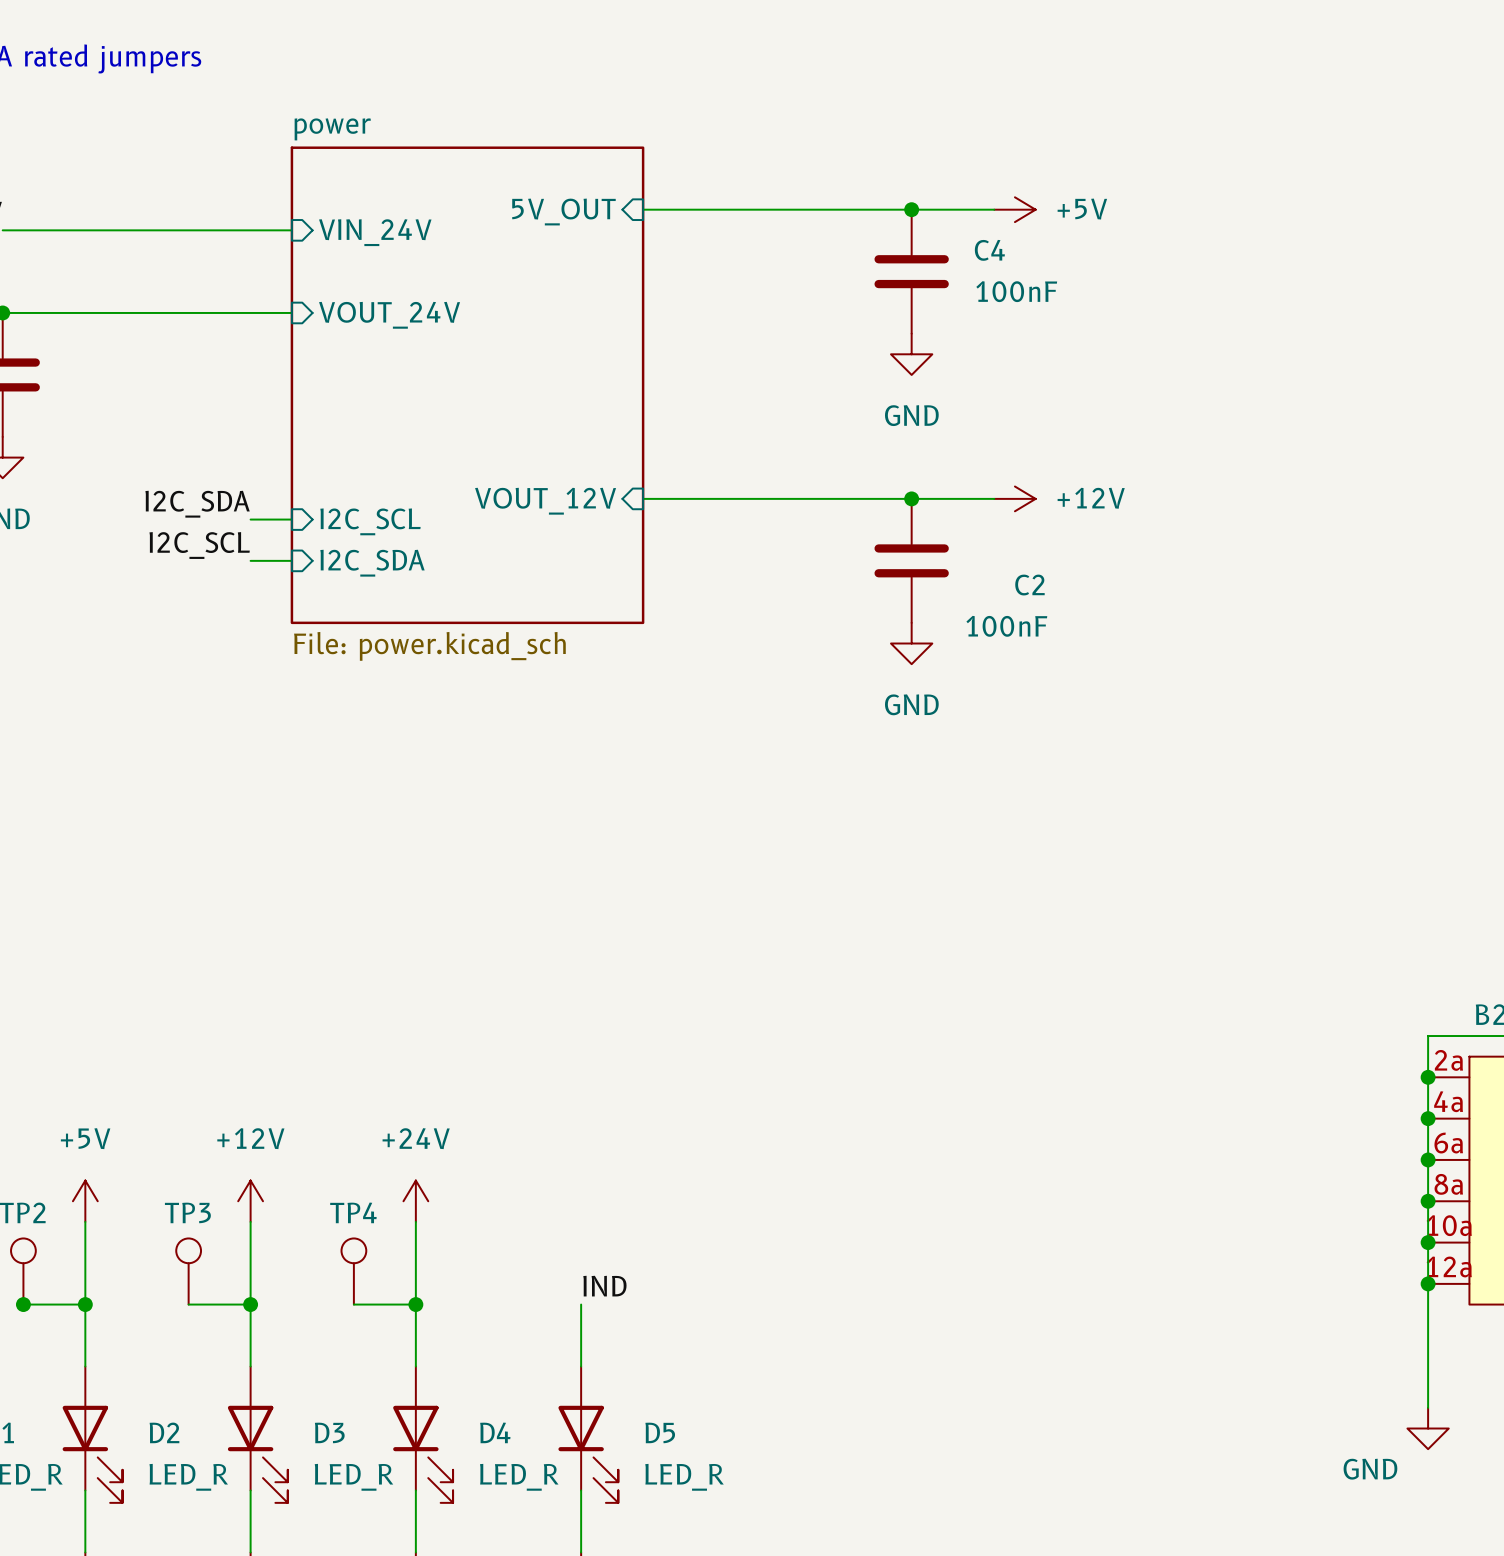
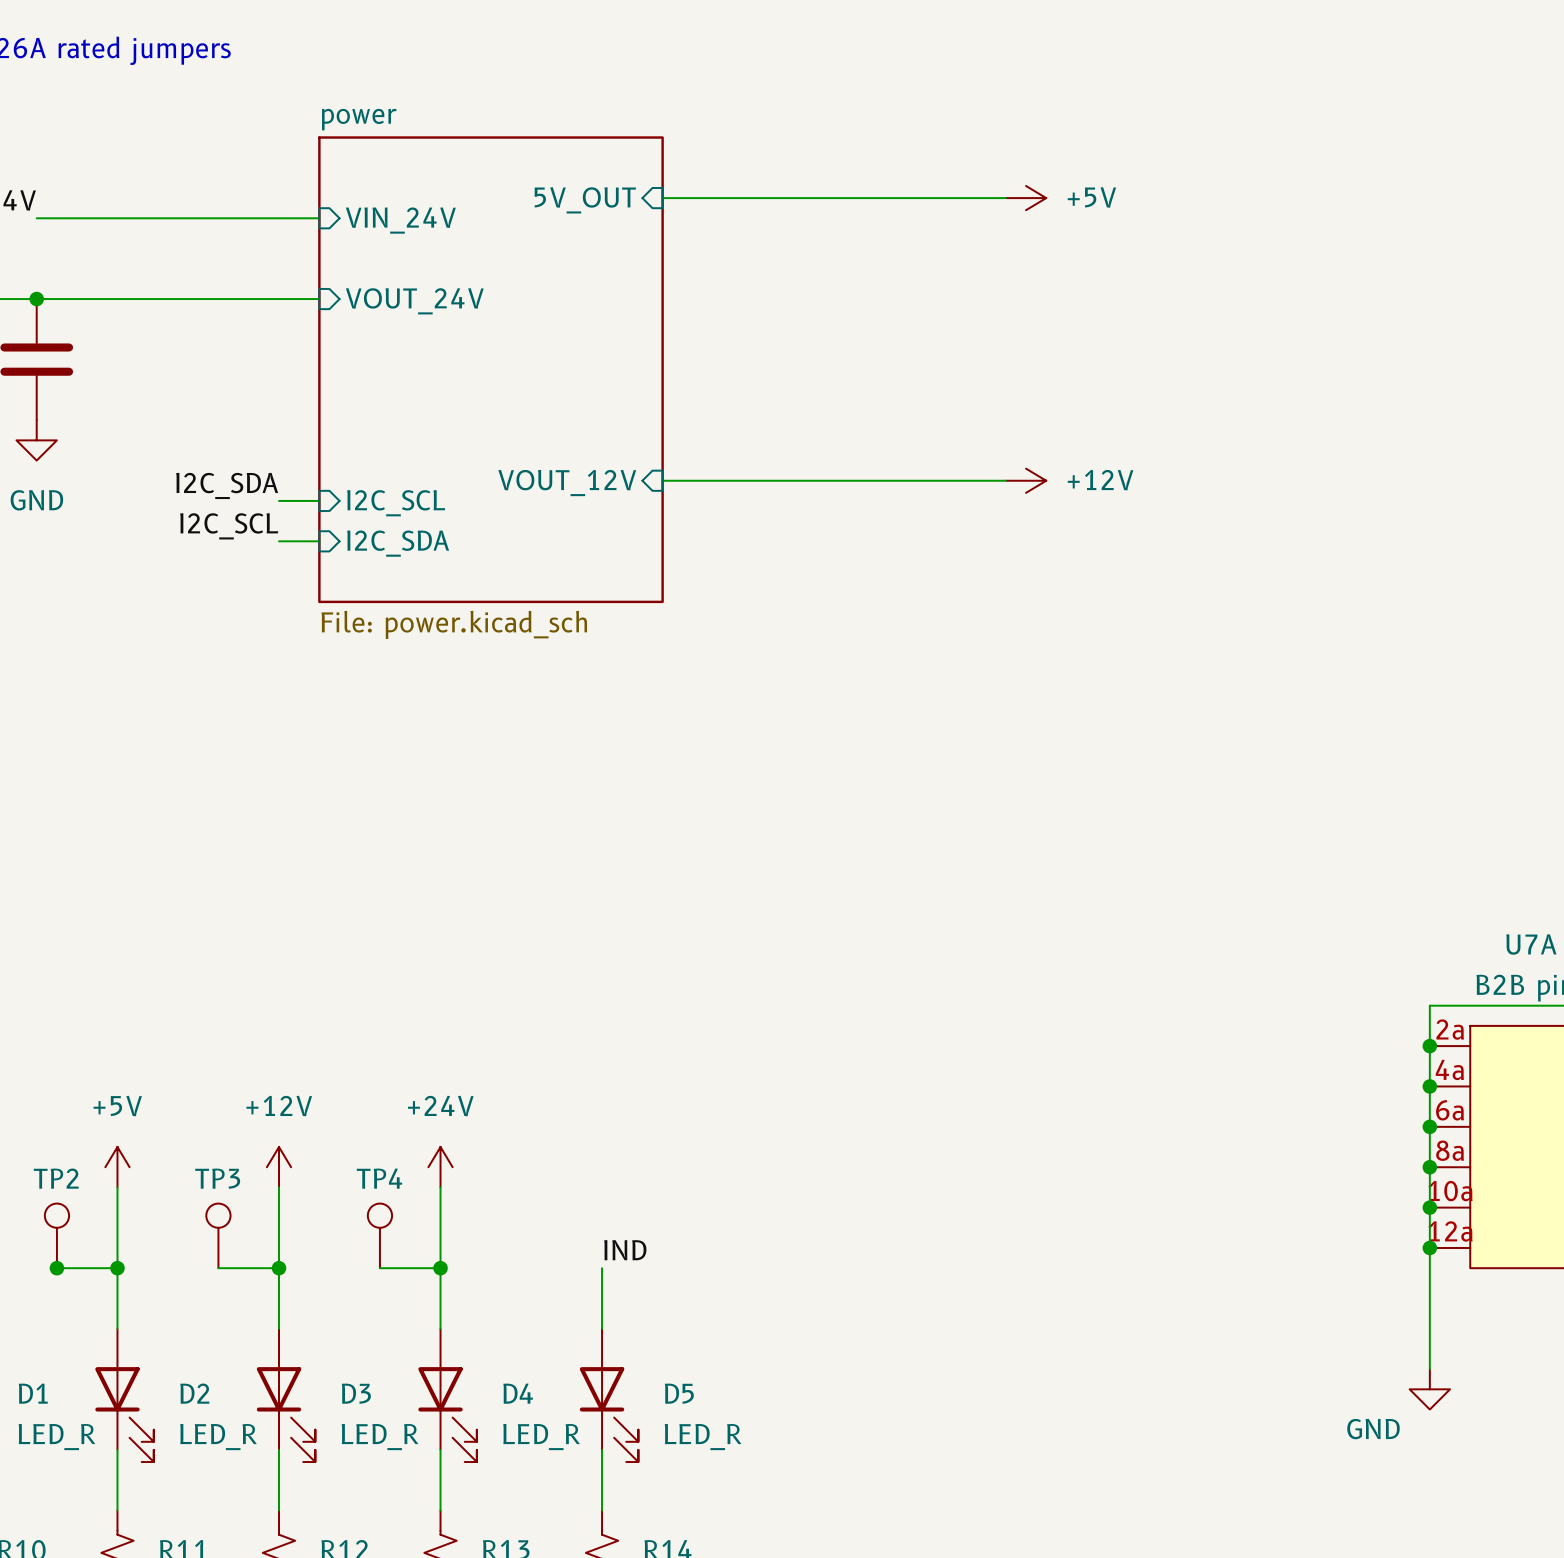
junction: (911, 209) -> none
C4: 100nF (911, 271) -> none
power symbol: GND (911, 354) -> none
junction: (911, 498) -> none
C2: 100nF (911, 560) -> none
power symbol: GND (911, 643) -> none

